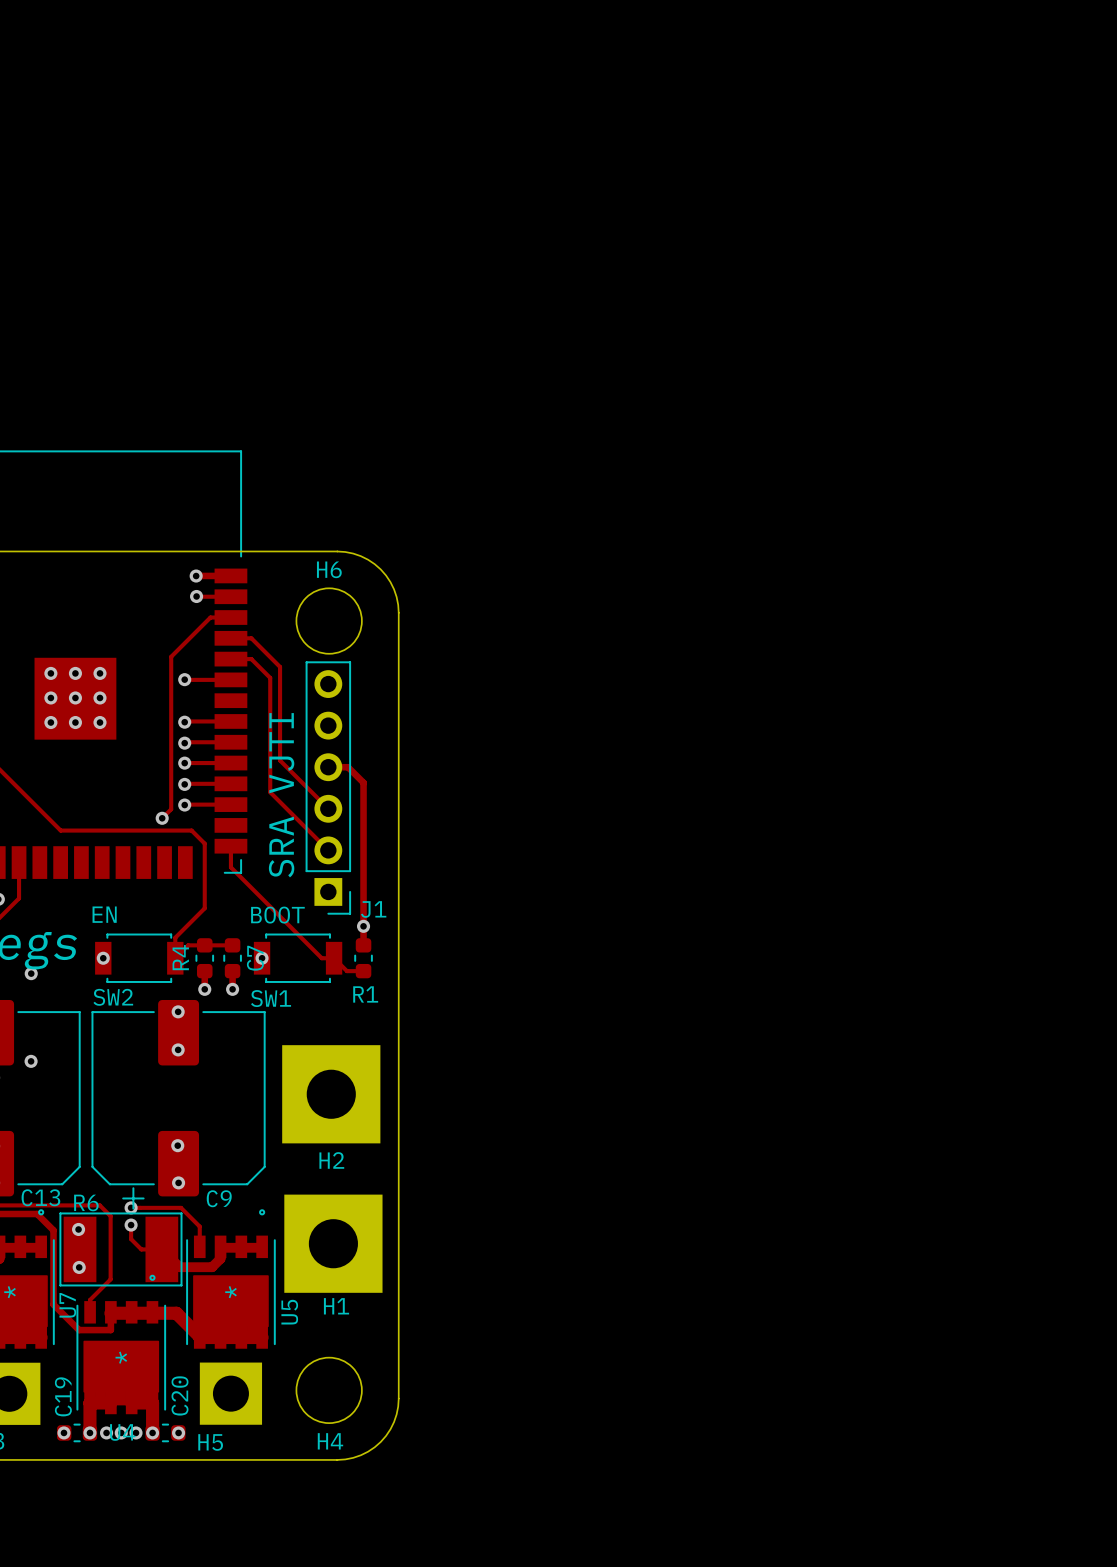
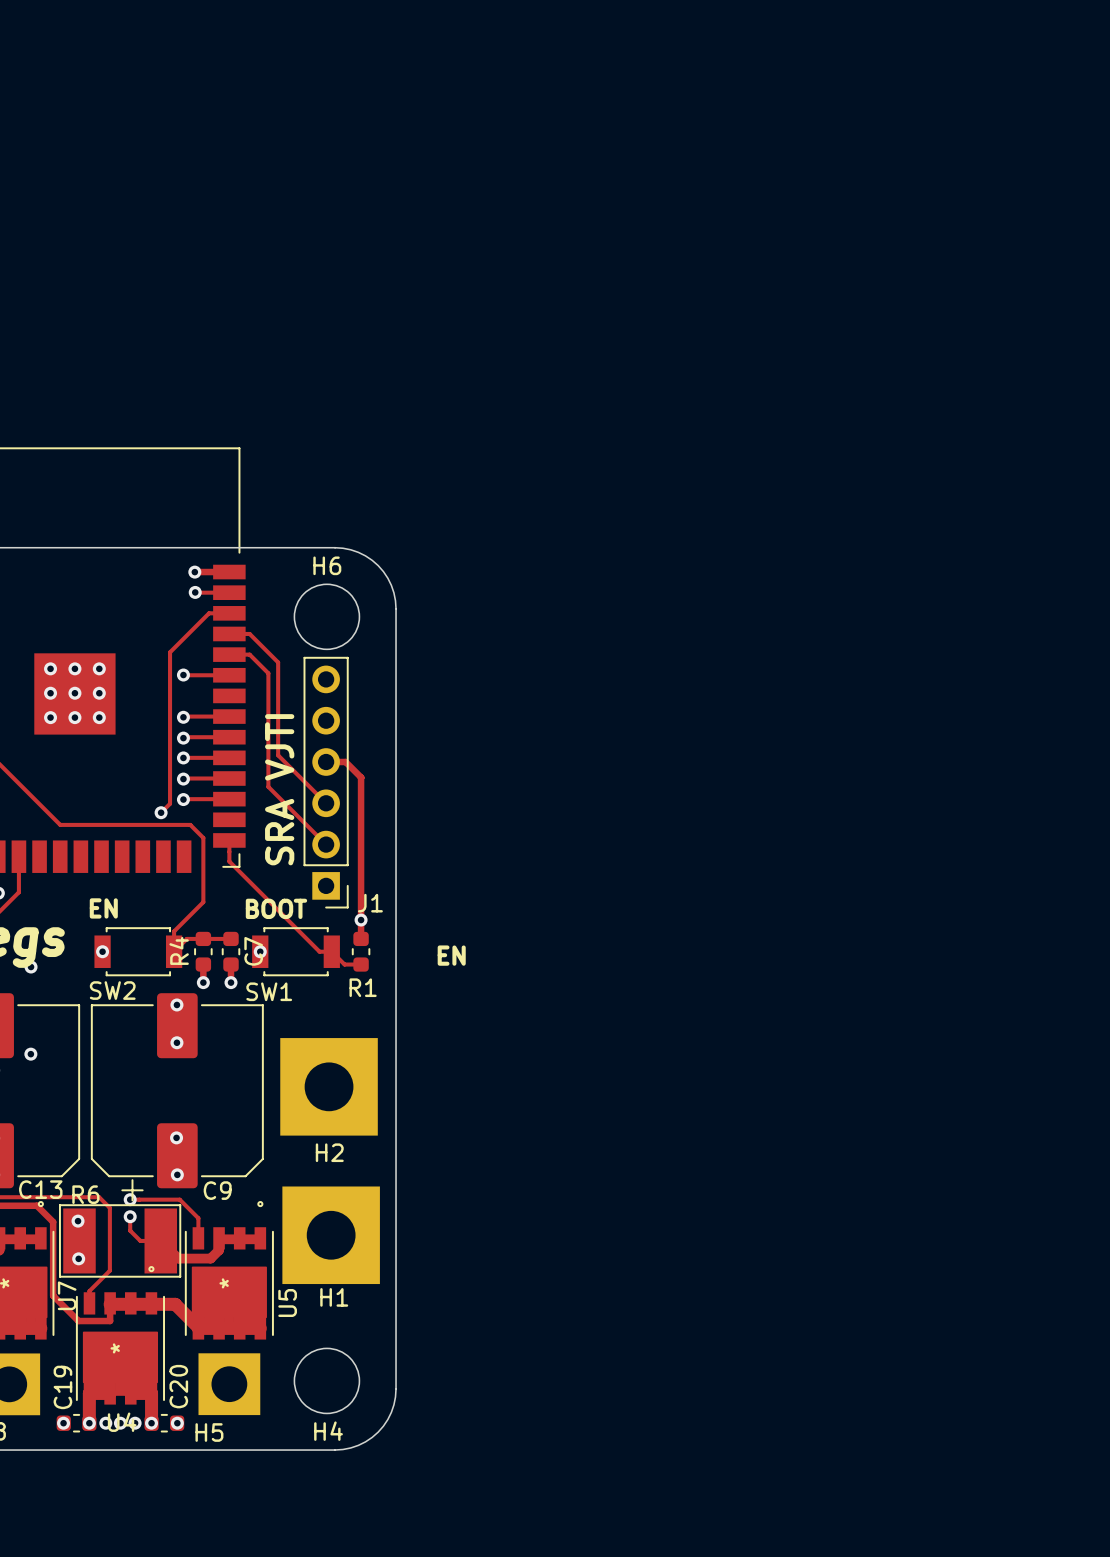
text: none -> EN (451, 955)

